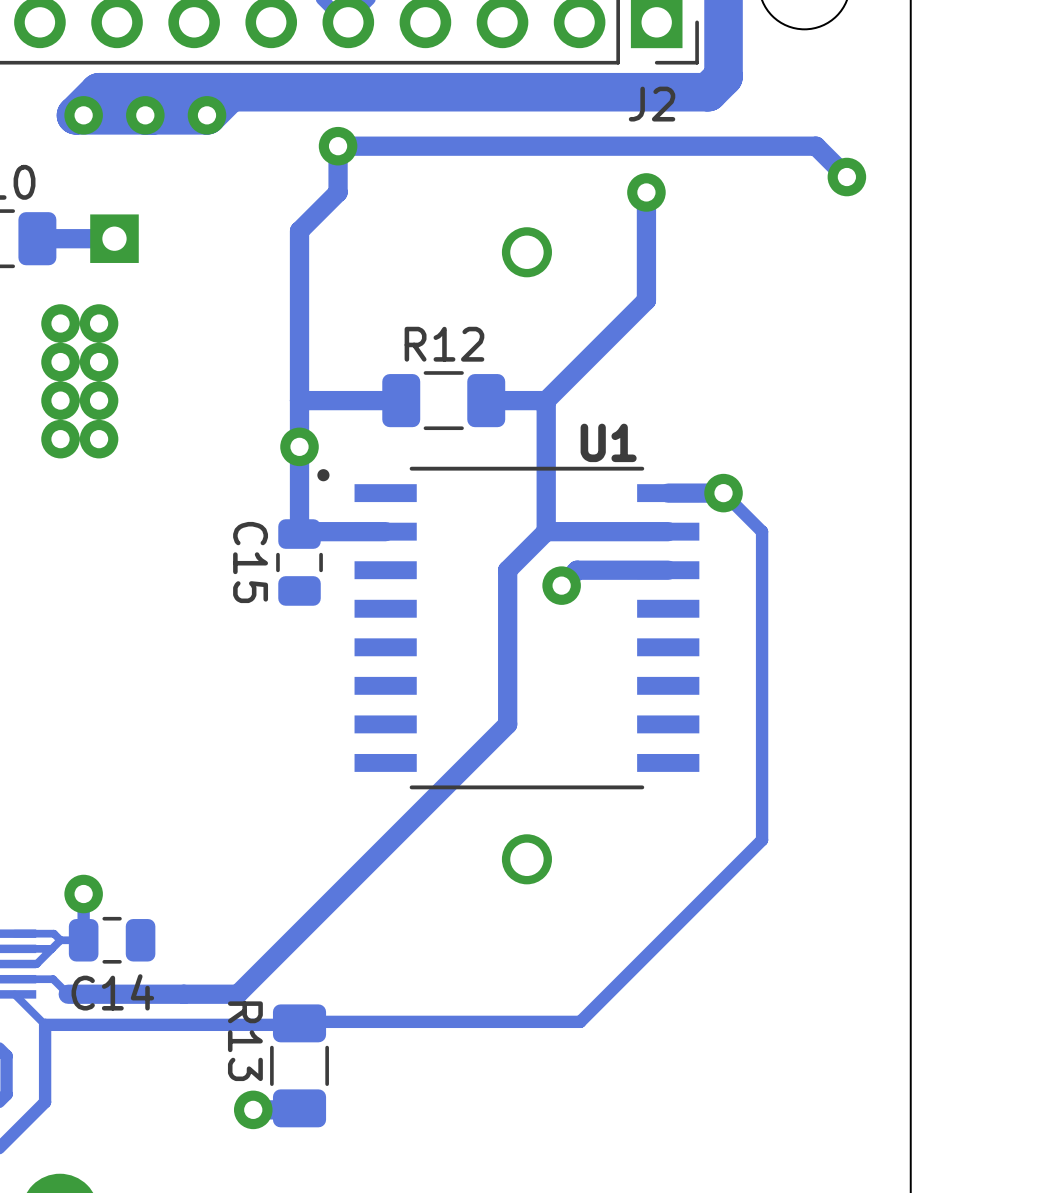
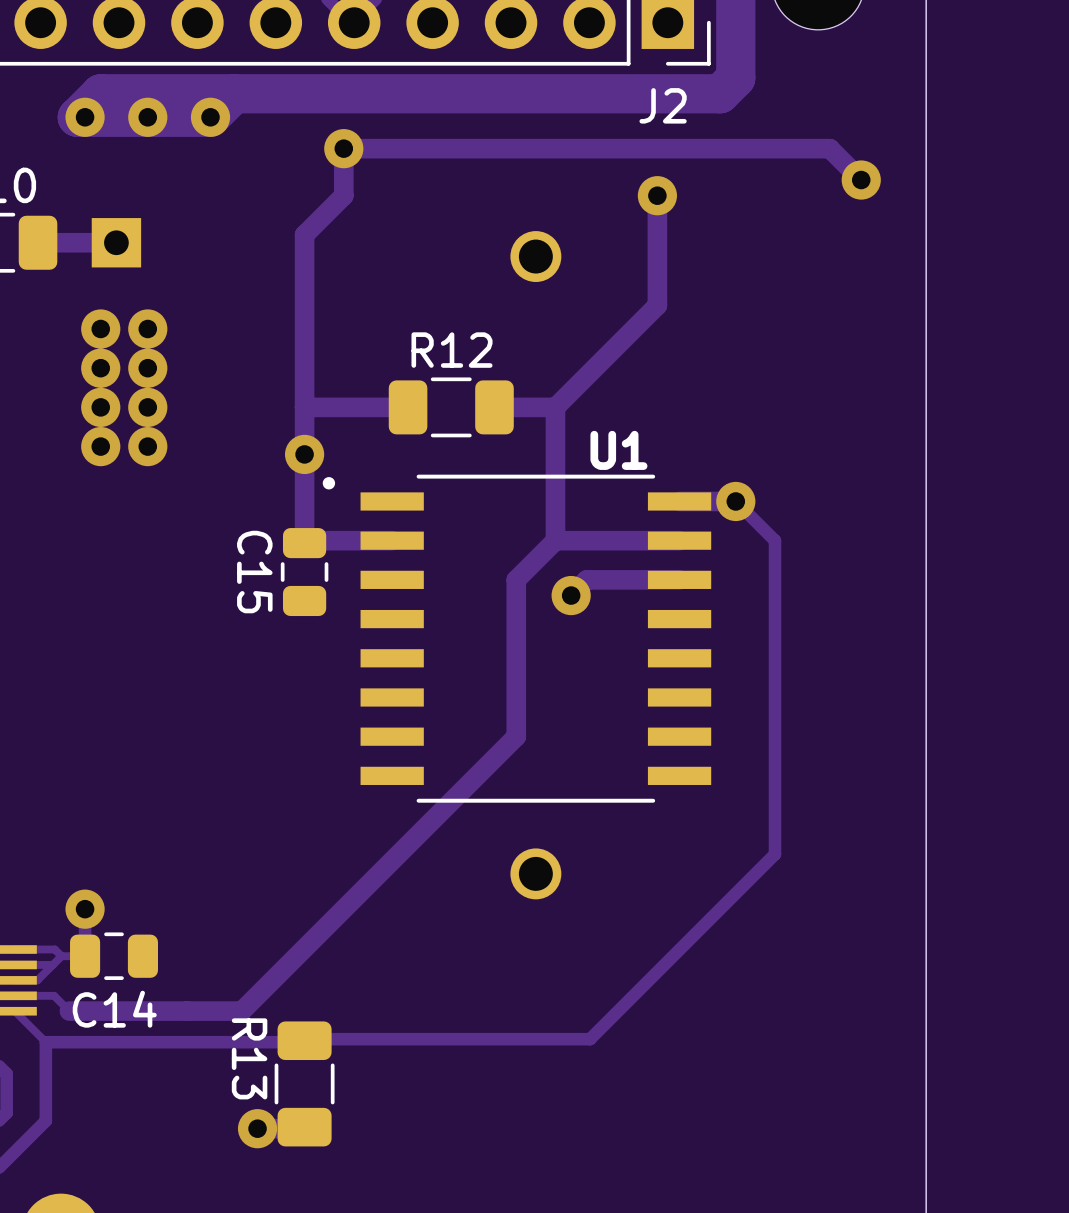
via: (60, 323) -> none
via: none -> (147, 328)
via: (60, 362) -> none
via: none -> (147, 368)
via: (60, 400) -> none
via: none -> (147, 407)
via: (60, 439) -> none
via: none -> (147, 446)

